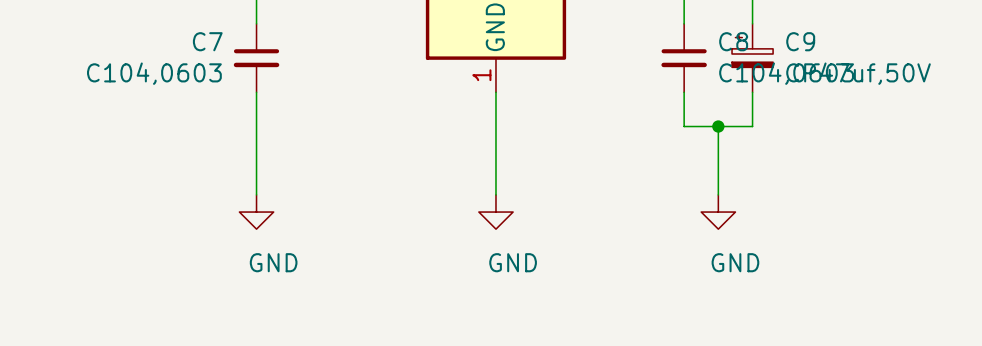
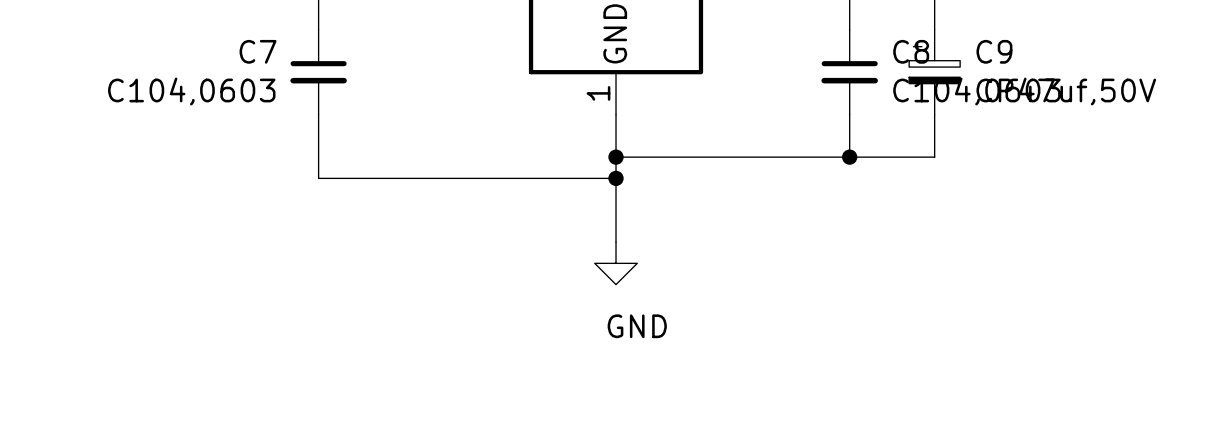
wire: none -> (616, 157) (849, 157)
junction: none -> (616, 157)
wire: (718, 126) (718, 194) -> none
junction position: (718, 126) -> (849, 157)
wire: (256, 143) (256, 194) -> (318, 178) (616, 178)
junction: none -> (616, 178)
power symbol: GND (256, 212) -> none
power symbol: GND (718, 212) -> none

